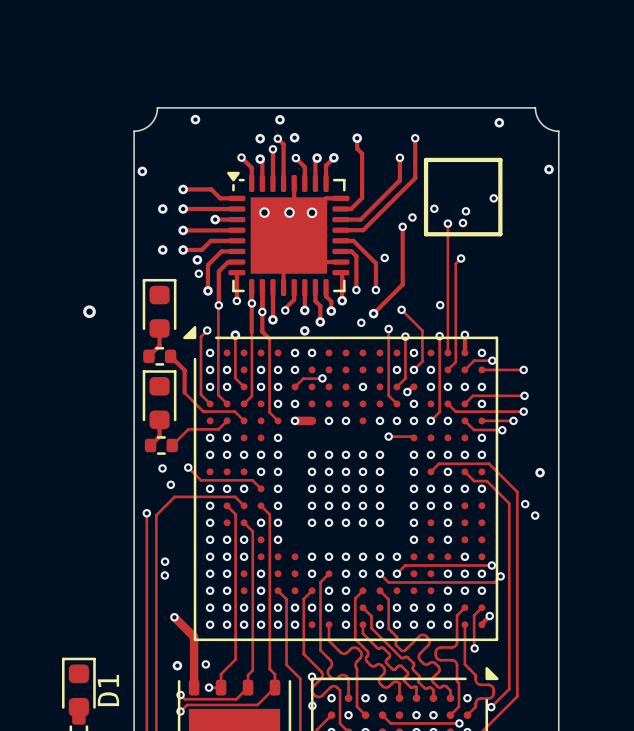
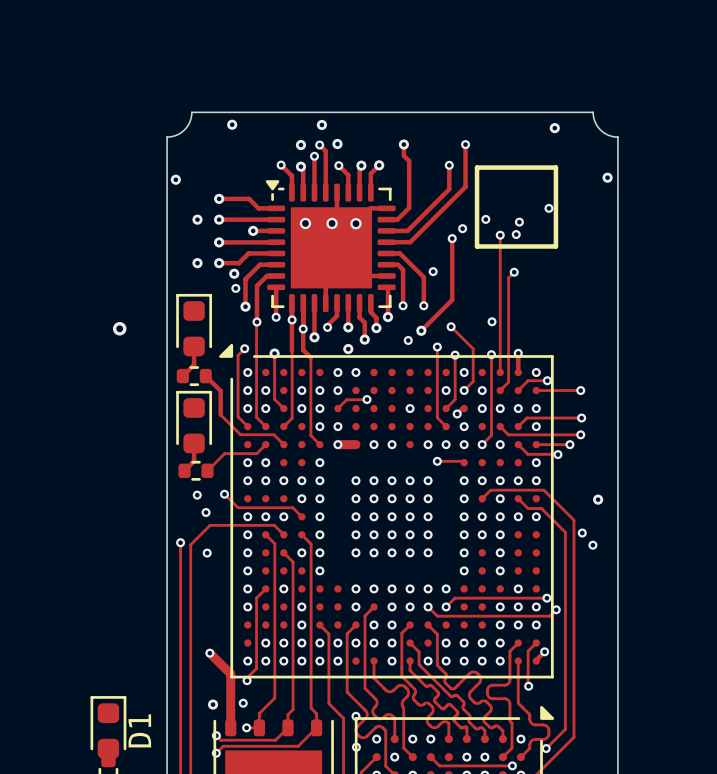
via: none -> (207, 553)
via: (227, 539) -> none
via: (244, 539) -> none
track: none -> (265, 588) (256, 598) (256, 668) (247, 677) (247, 680)
via: (227, 556) -> none
via: (165, 561) -> none
via: (227, 573) -> none
via: (164, 575) -> none
via: (210, 590) -> none
via: (227, 590) -> none
via: (210, 607) -> none
via: none -> (247, 680)

